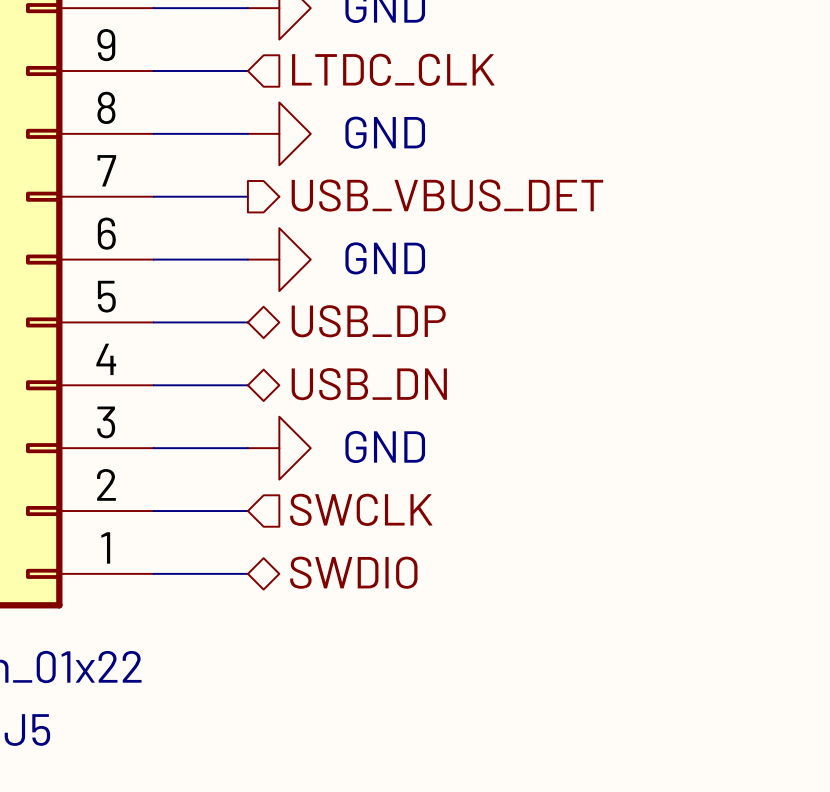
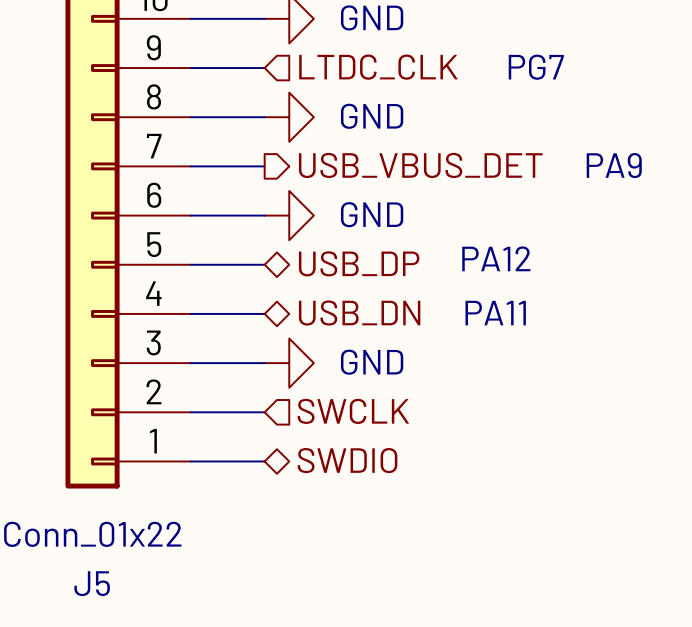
text: none -> PG7 (536, 67)
text: none -> PA9 (614, 165)
text: none -> PA12 (496, 258)
text: none -> PA11 (495, 313)

